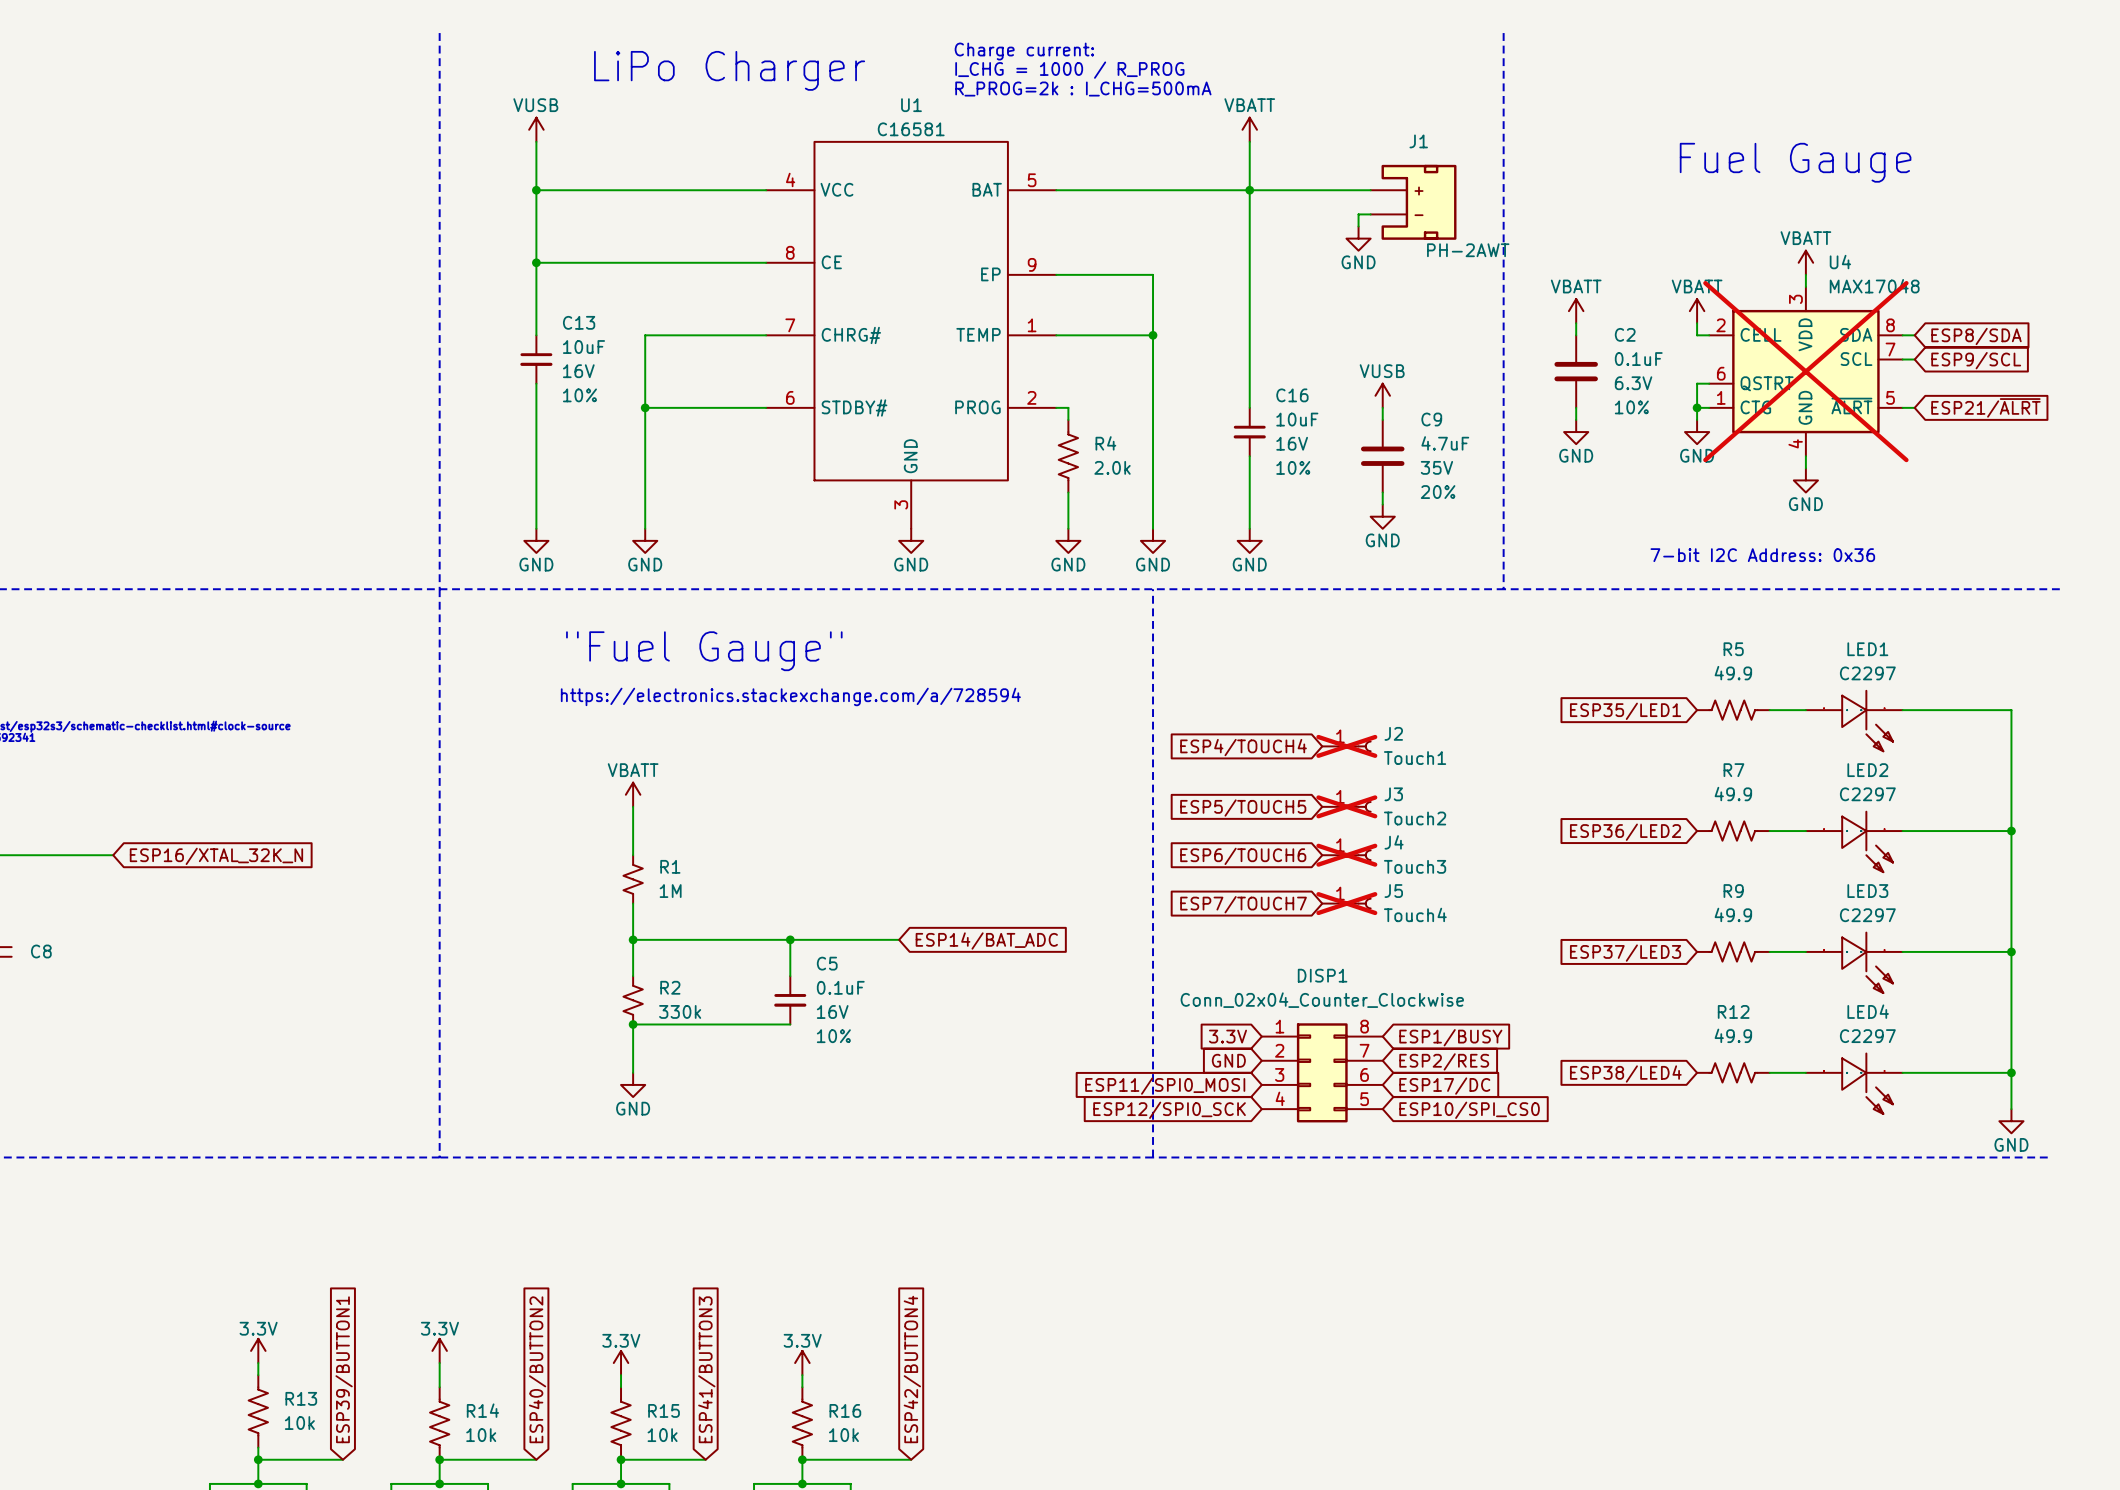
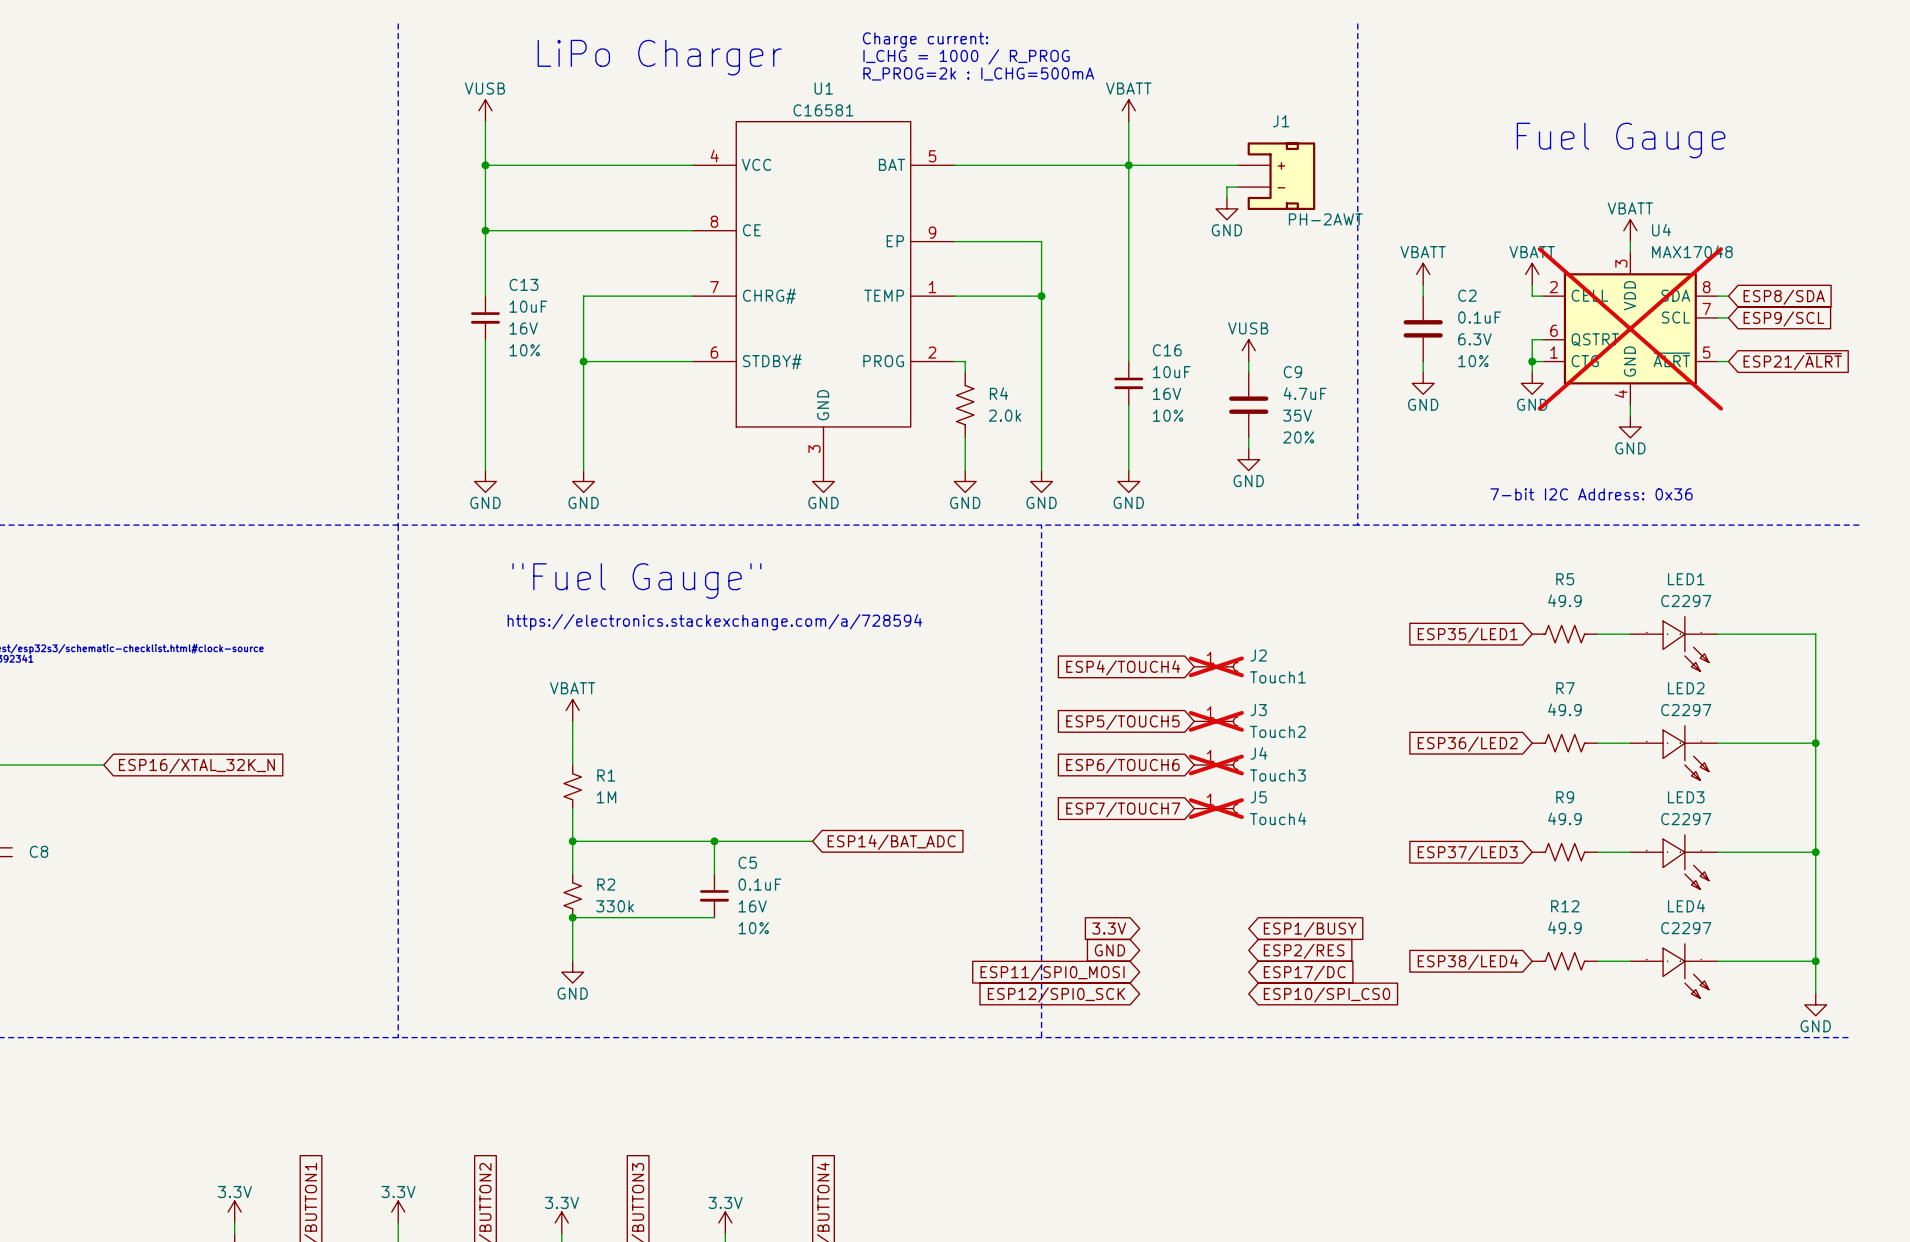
DISP1: Conn_02x04_Counter_Clockwise (1322, 1072) -> none

